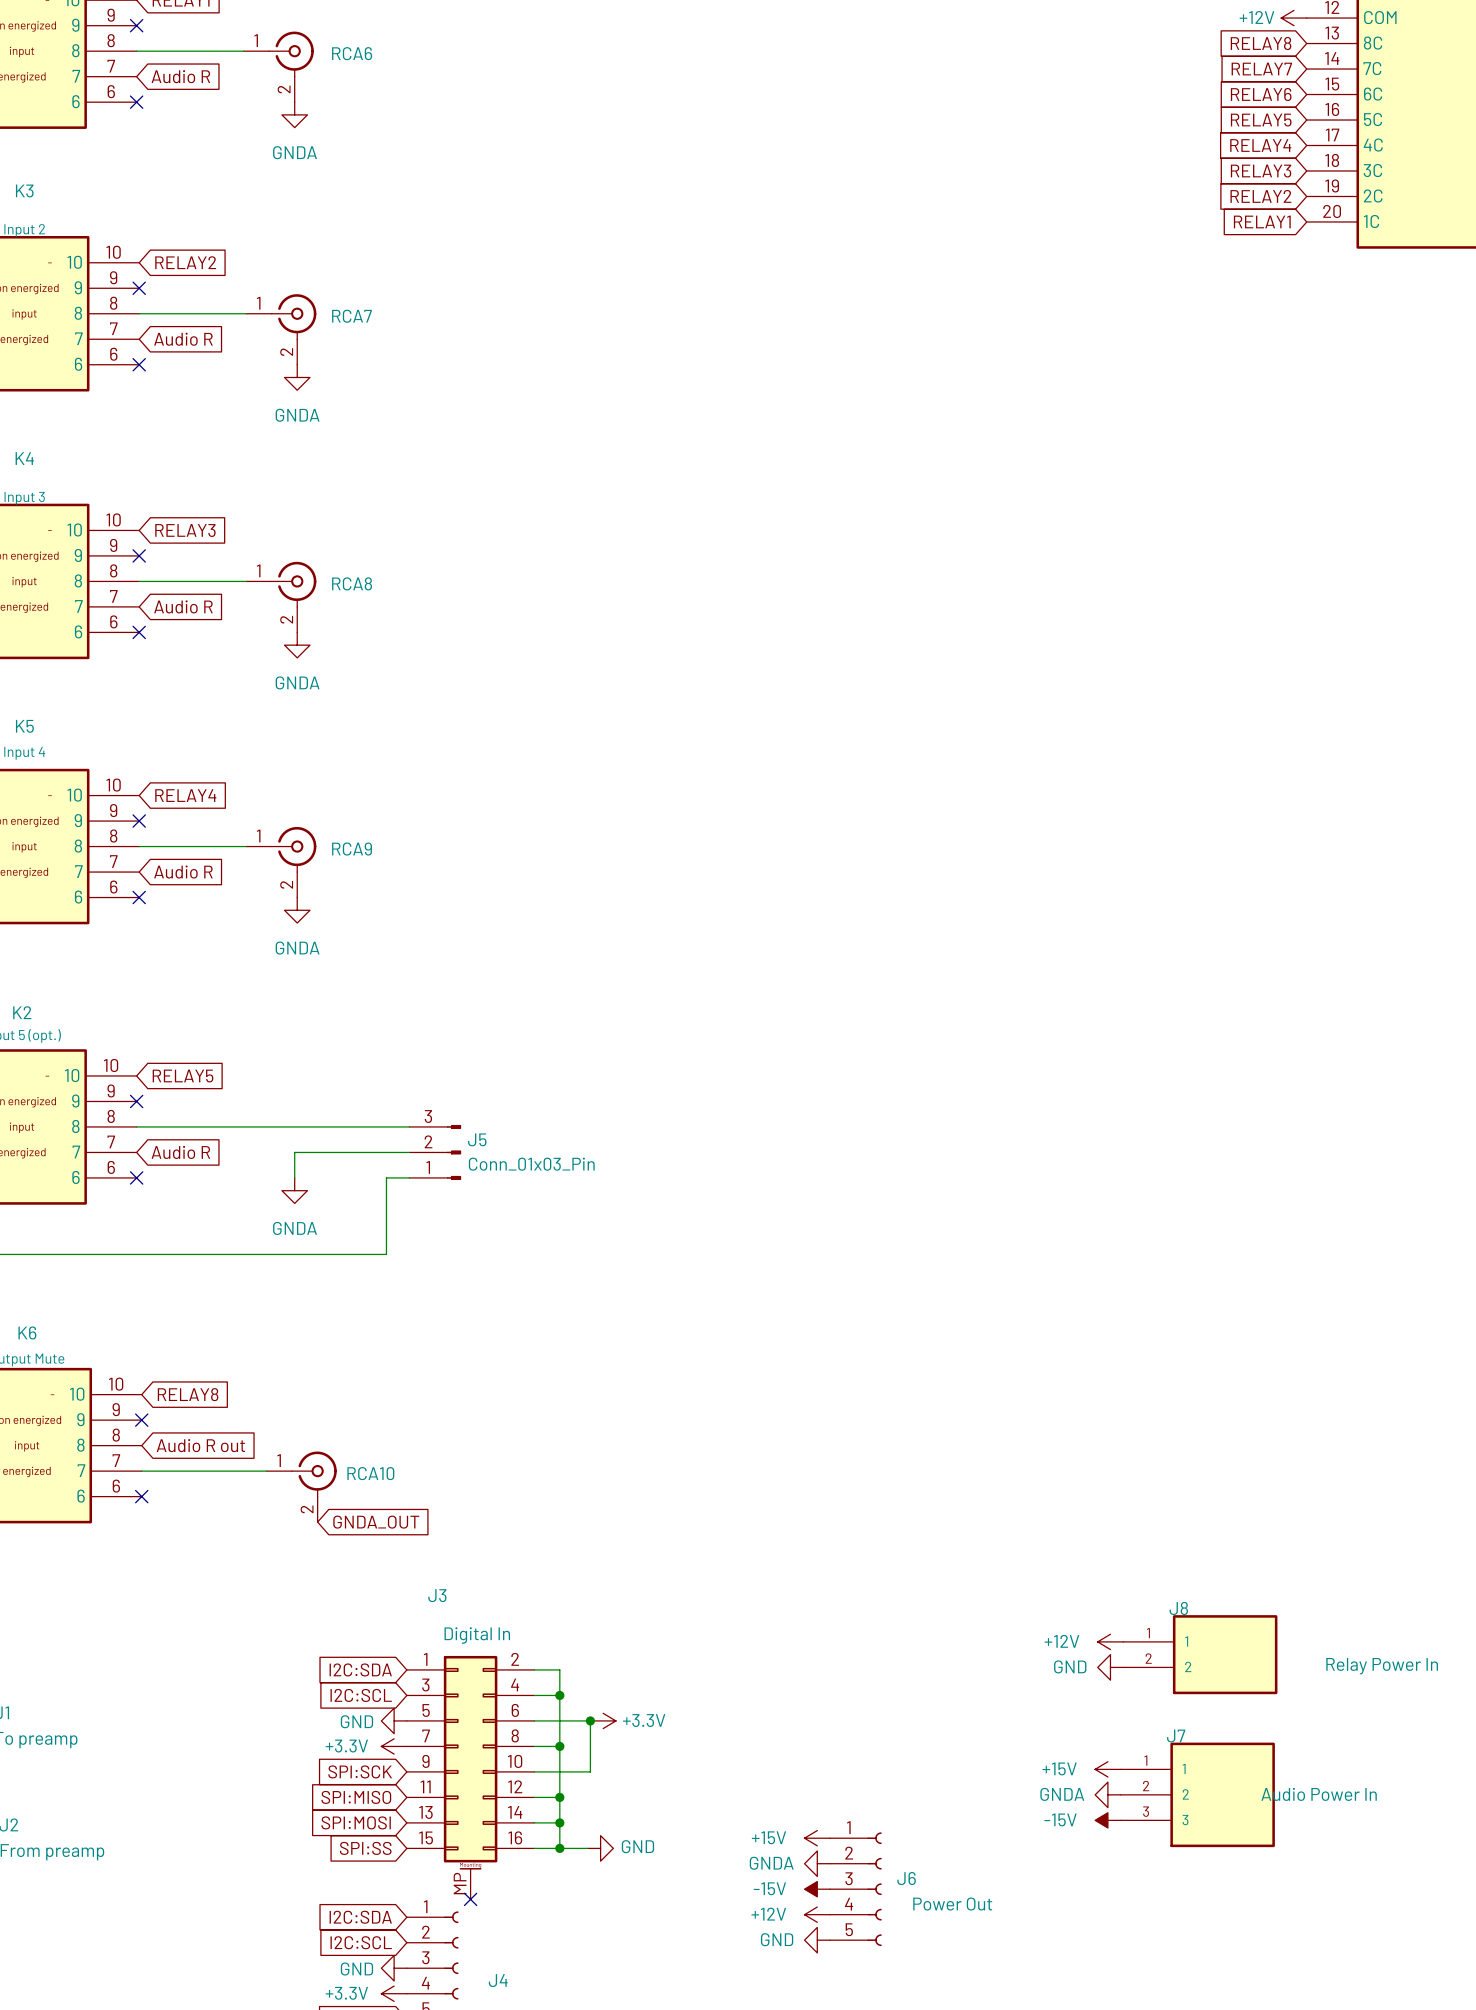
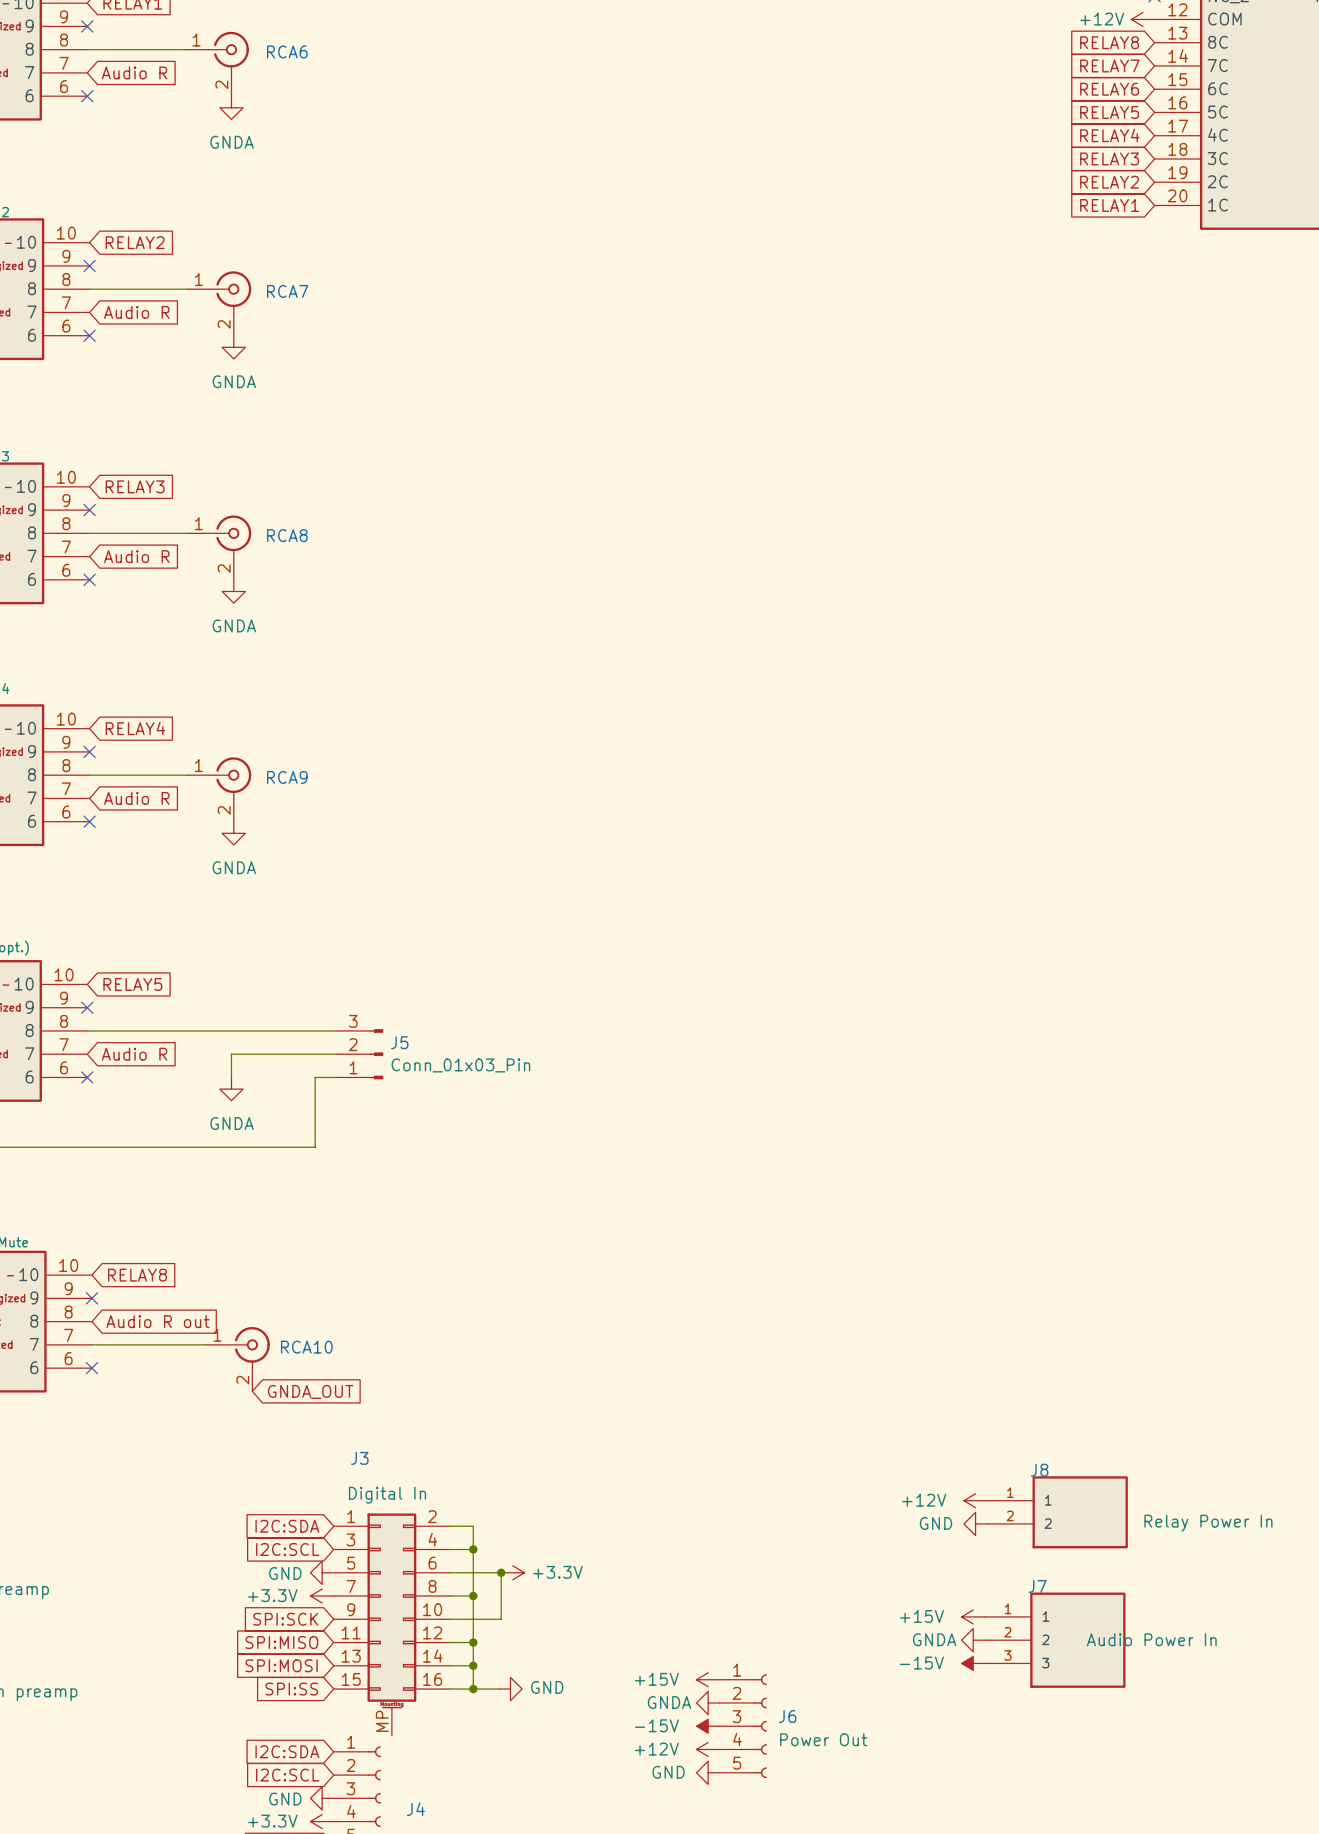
no-connect mark: (470, 1899) -> none

